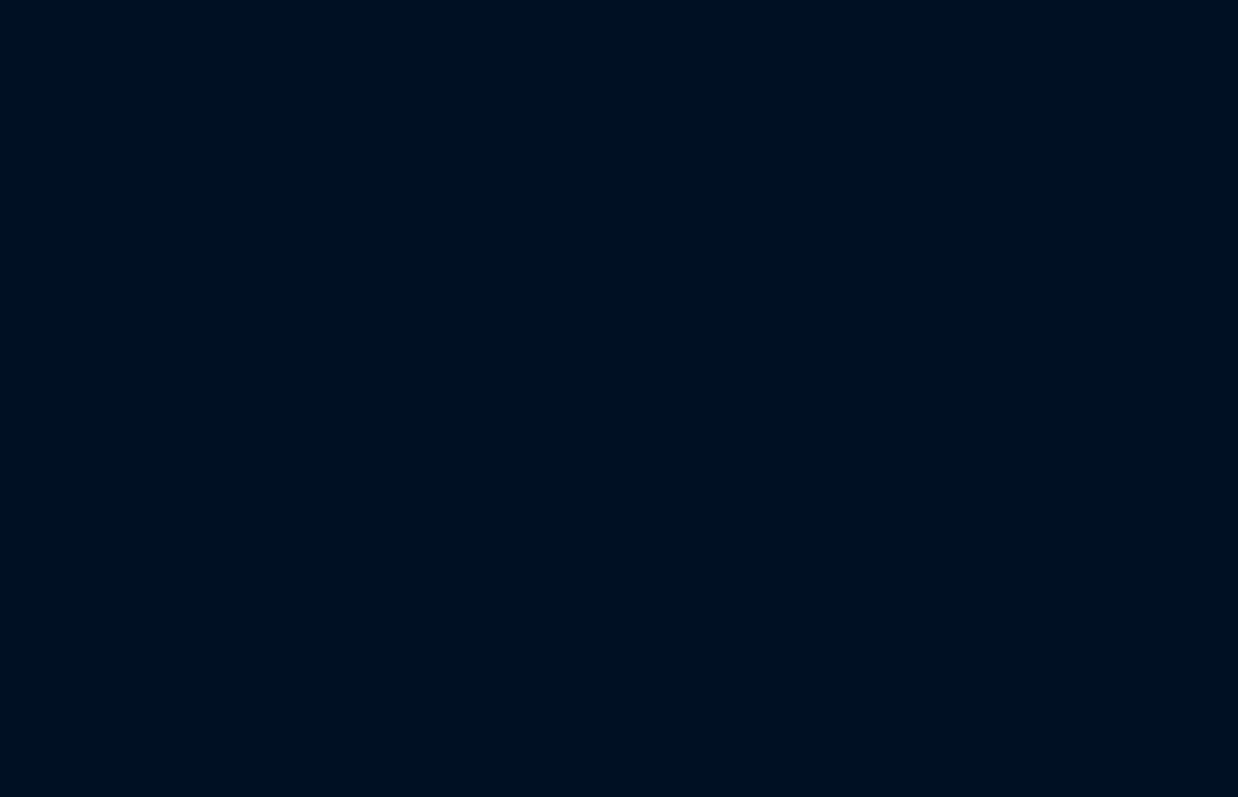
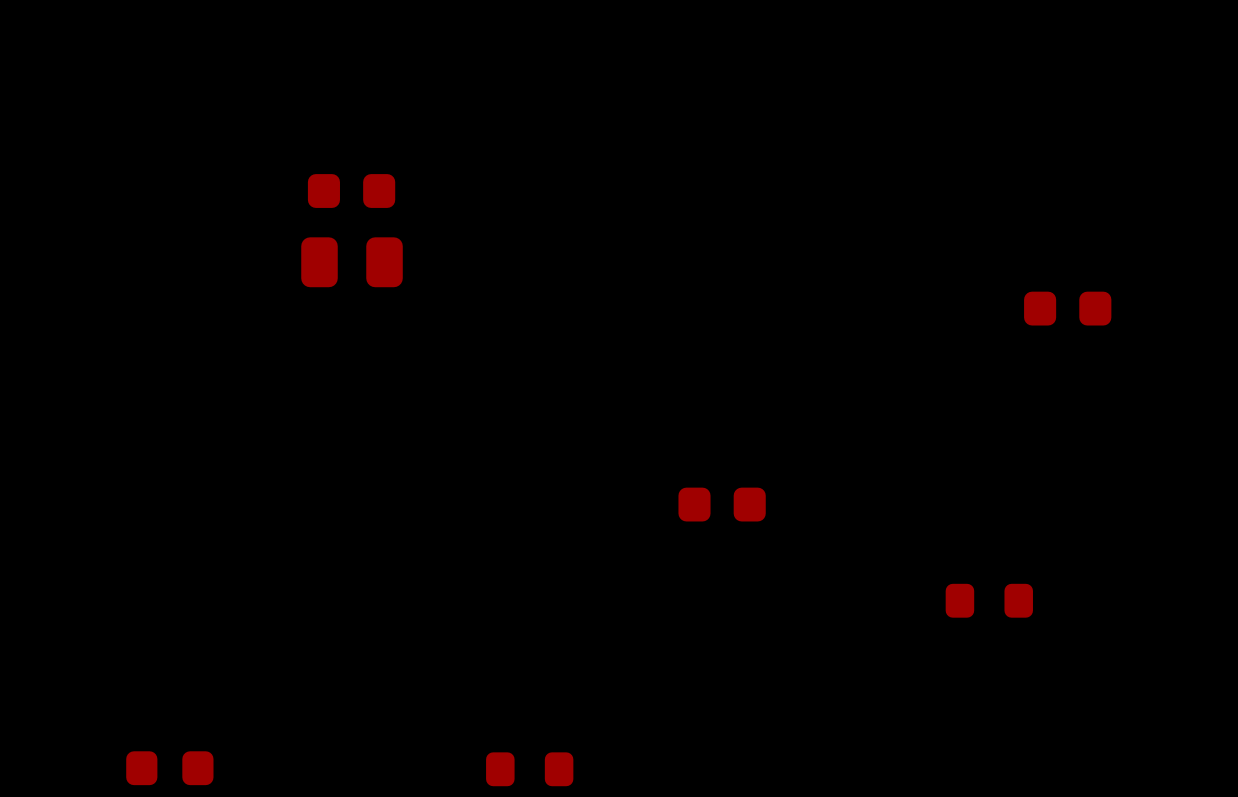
part: none -> (351, 191)
part: none -> (352, 262)
part: none -> (1067, 308)
part: none -> (722, 504)
part: none -> (989, 600)
part: none -> (169, 768)
part: none -> (529, 769)

